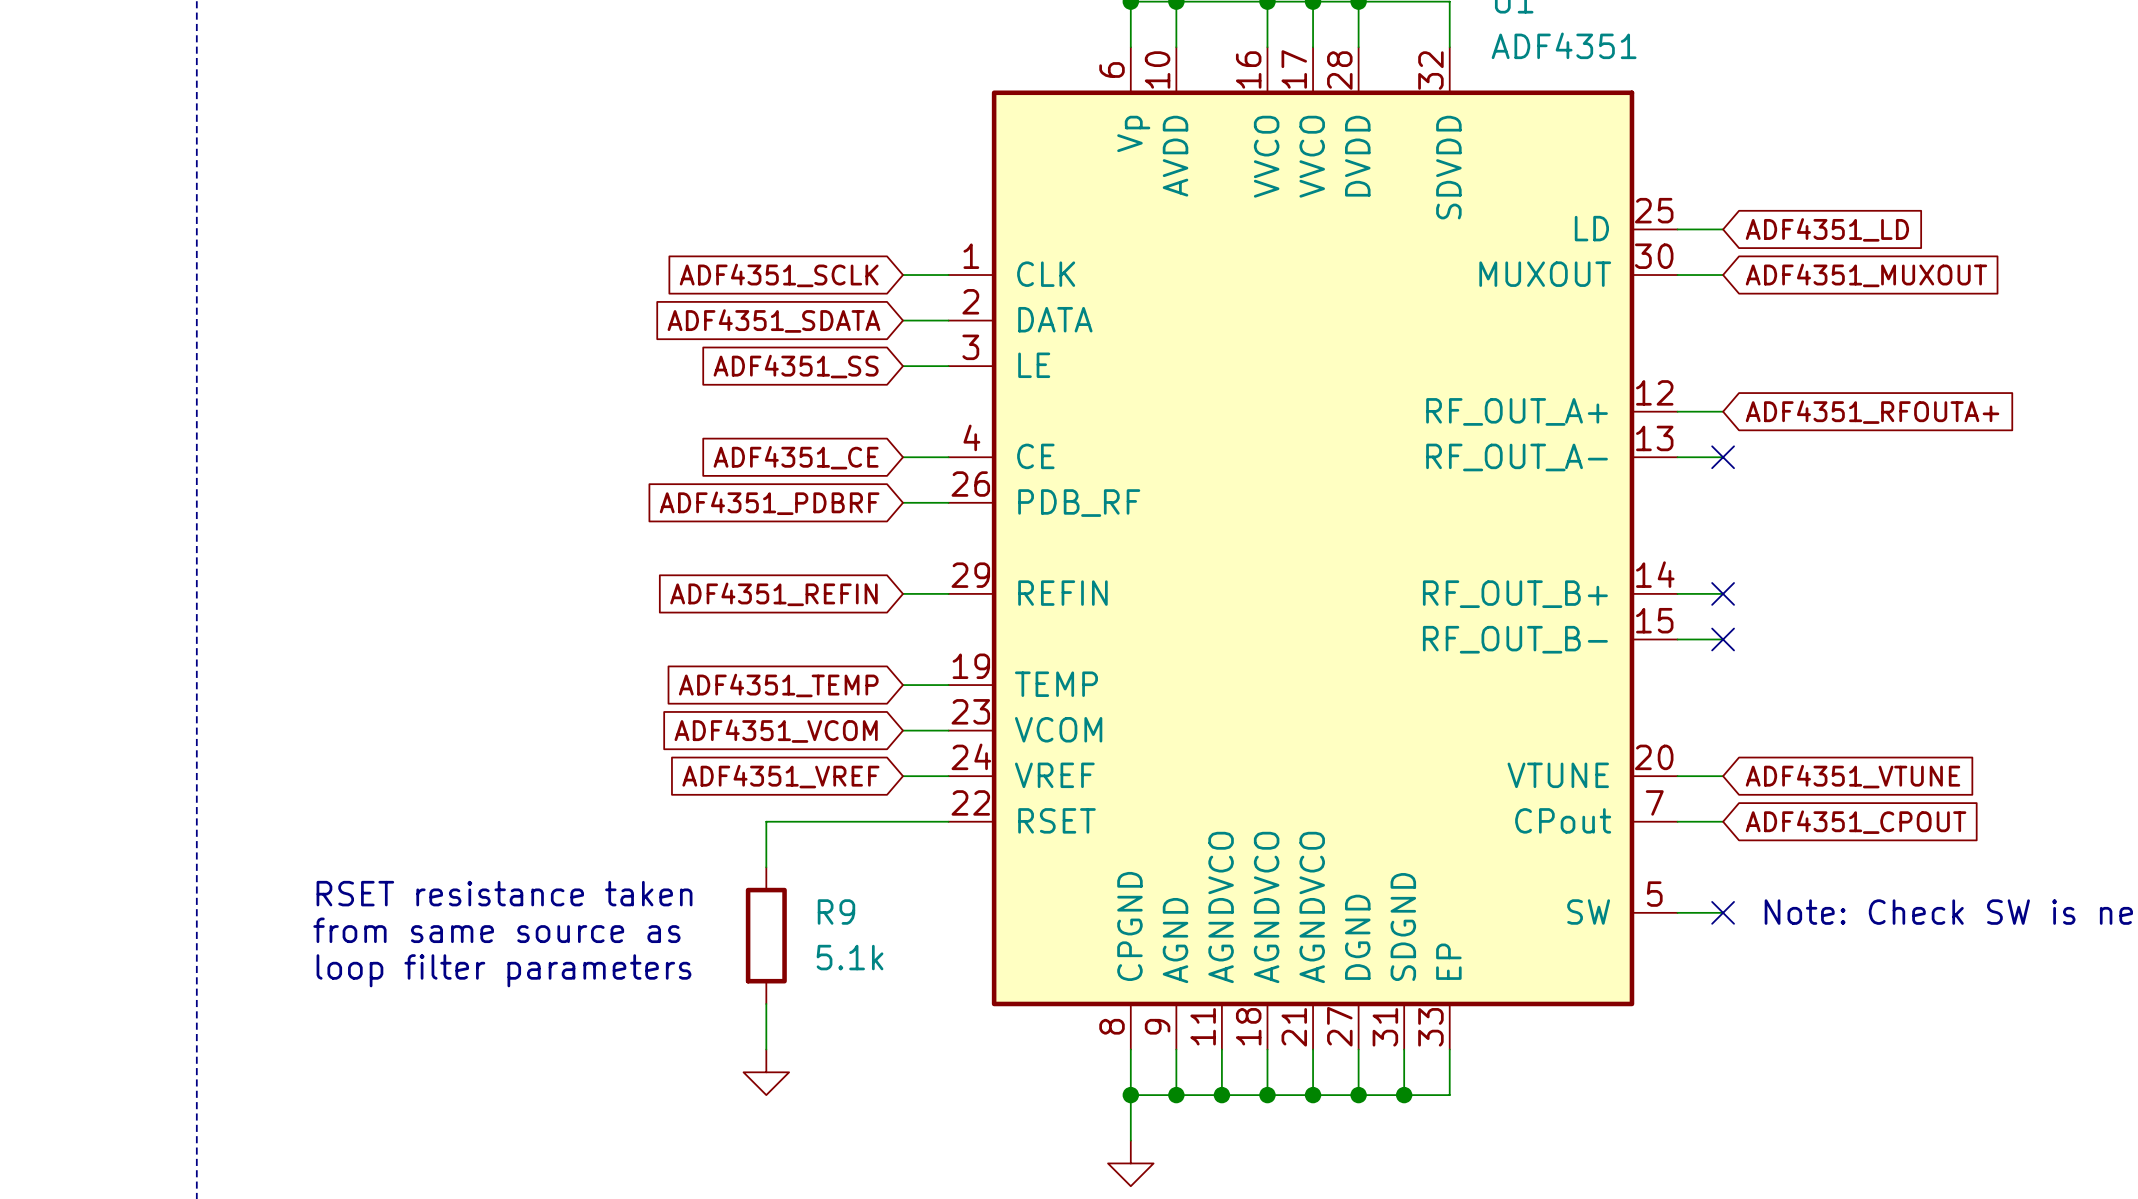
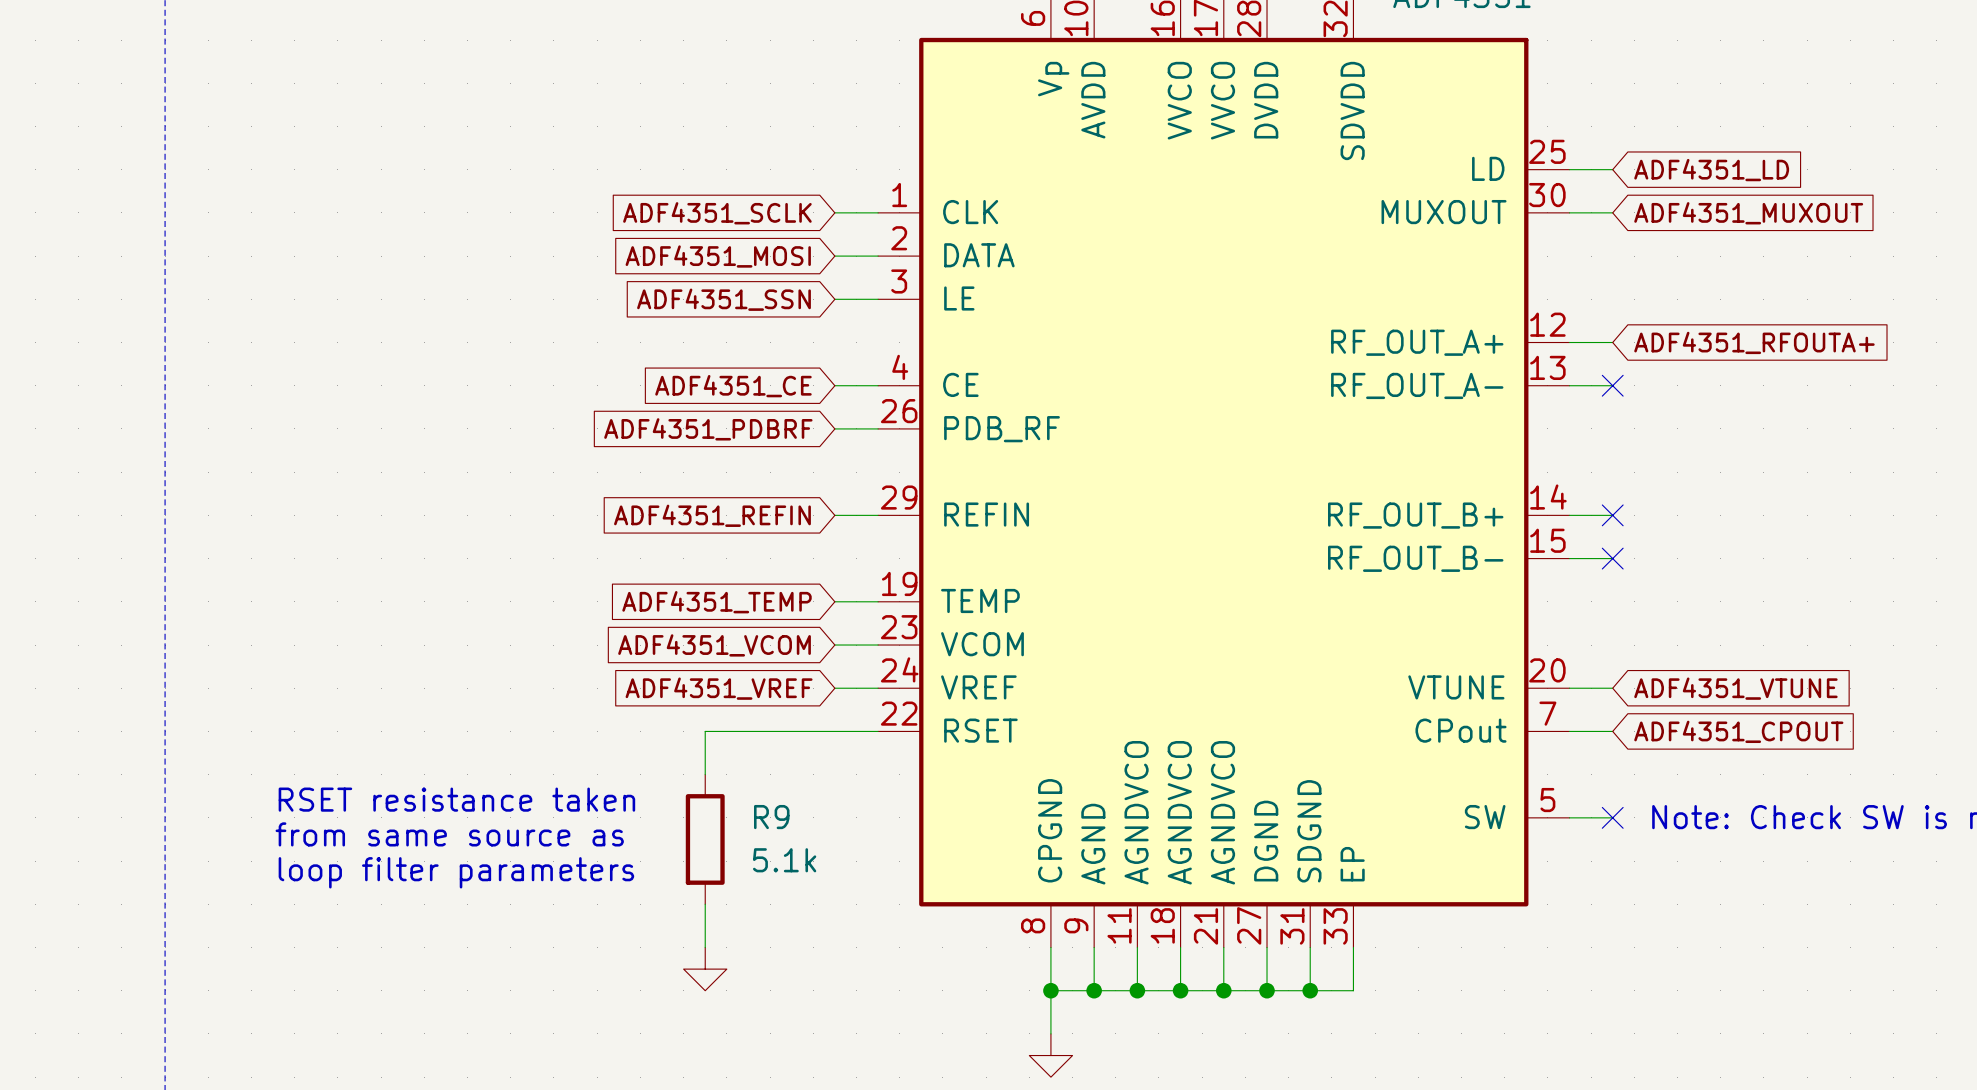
global label: ADF4351_SDATA (773, 321) -> ADF4351_MOSI (718, 256)
global label: ADF4351_SS (796, 366) -> ADF4351_SSN (724, 299)

